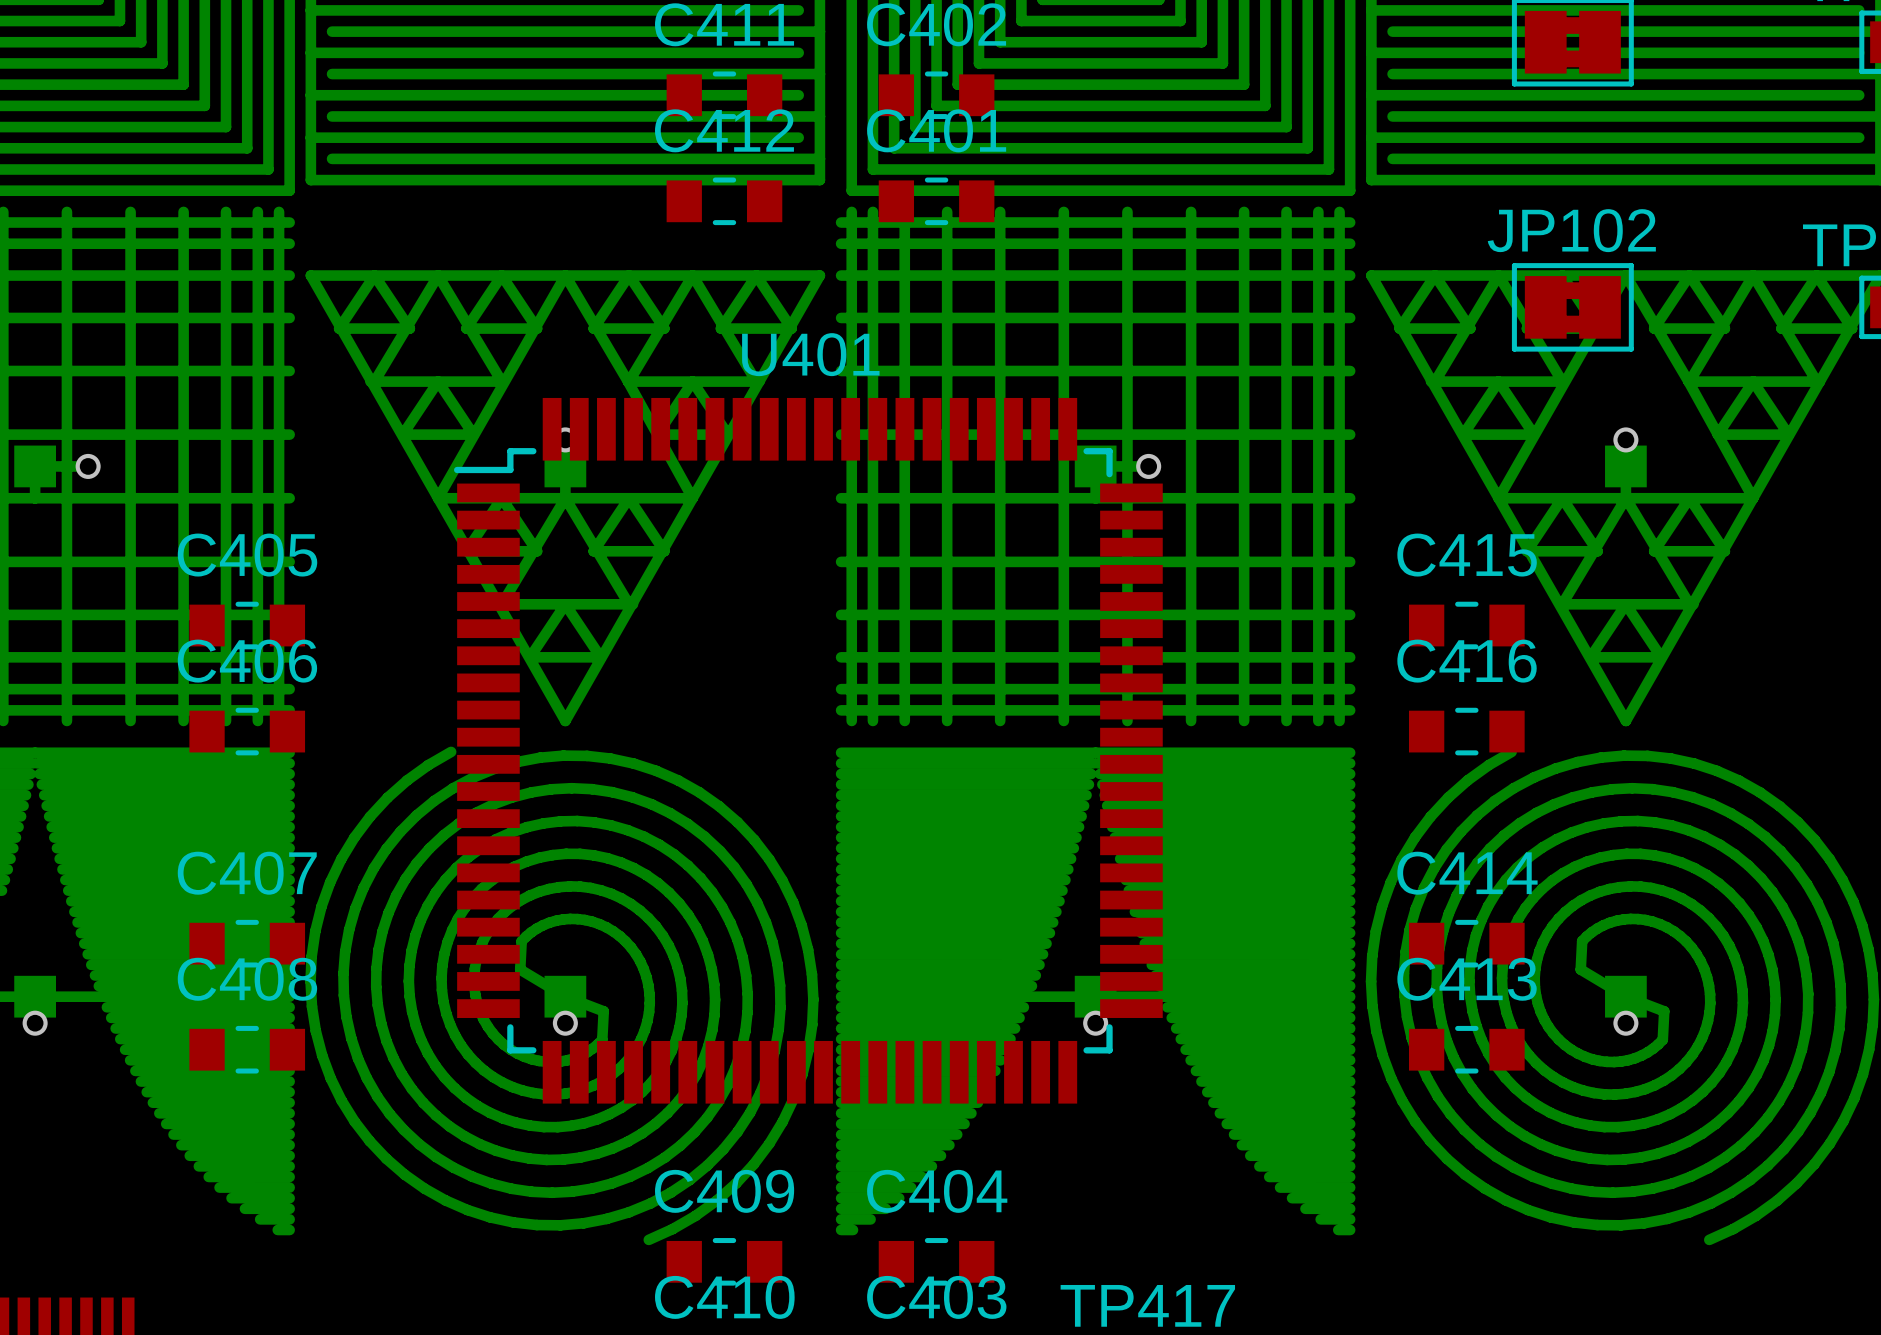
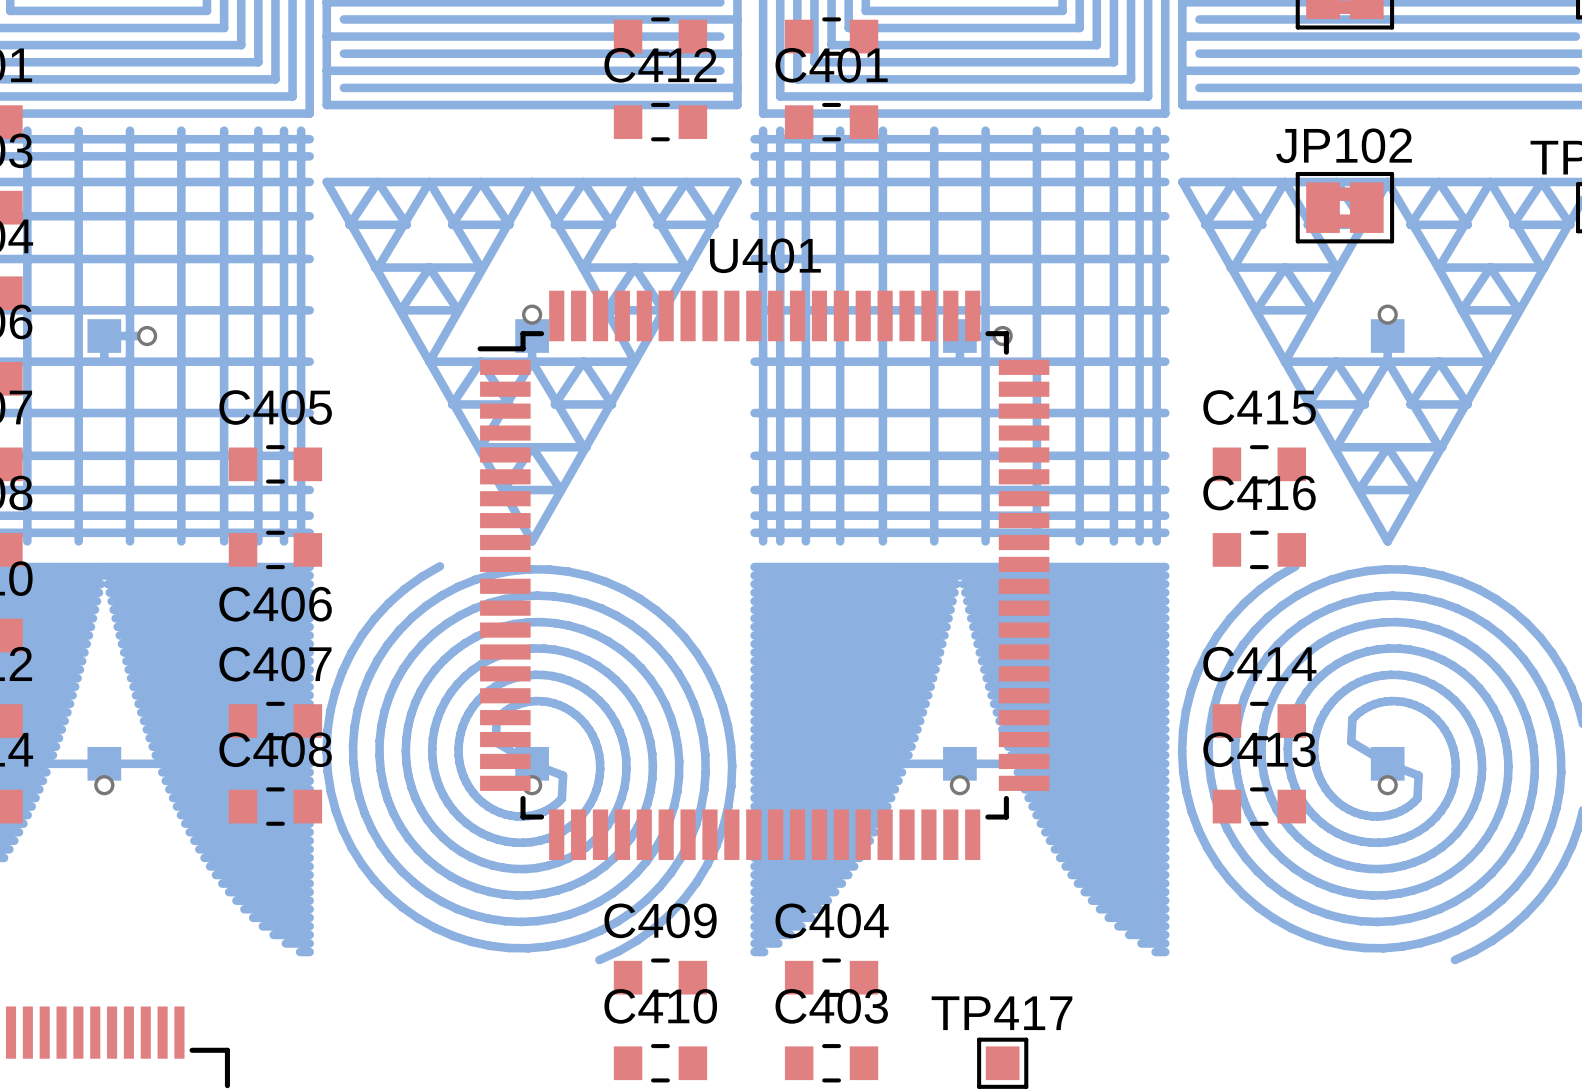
C406 name position: C406 (247, 661) -> C406 (275, 604)
U401 position: (808, 750) -> (763, 575)

